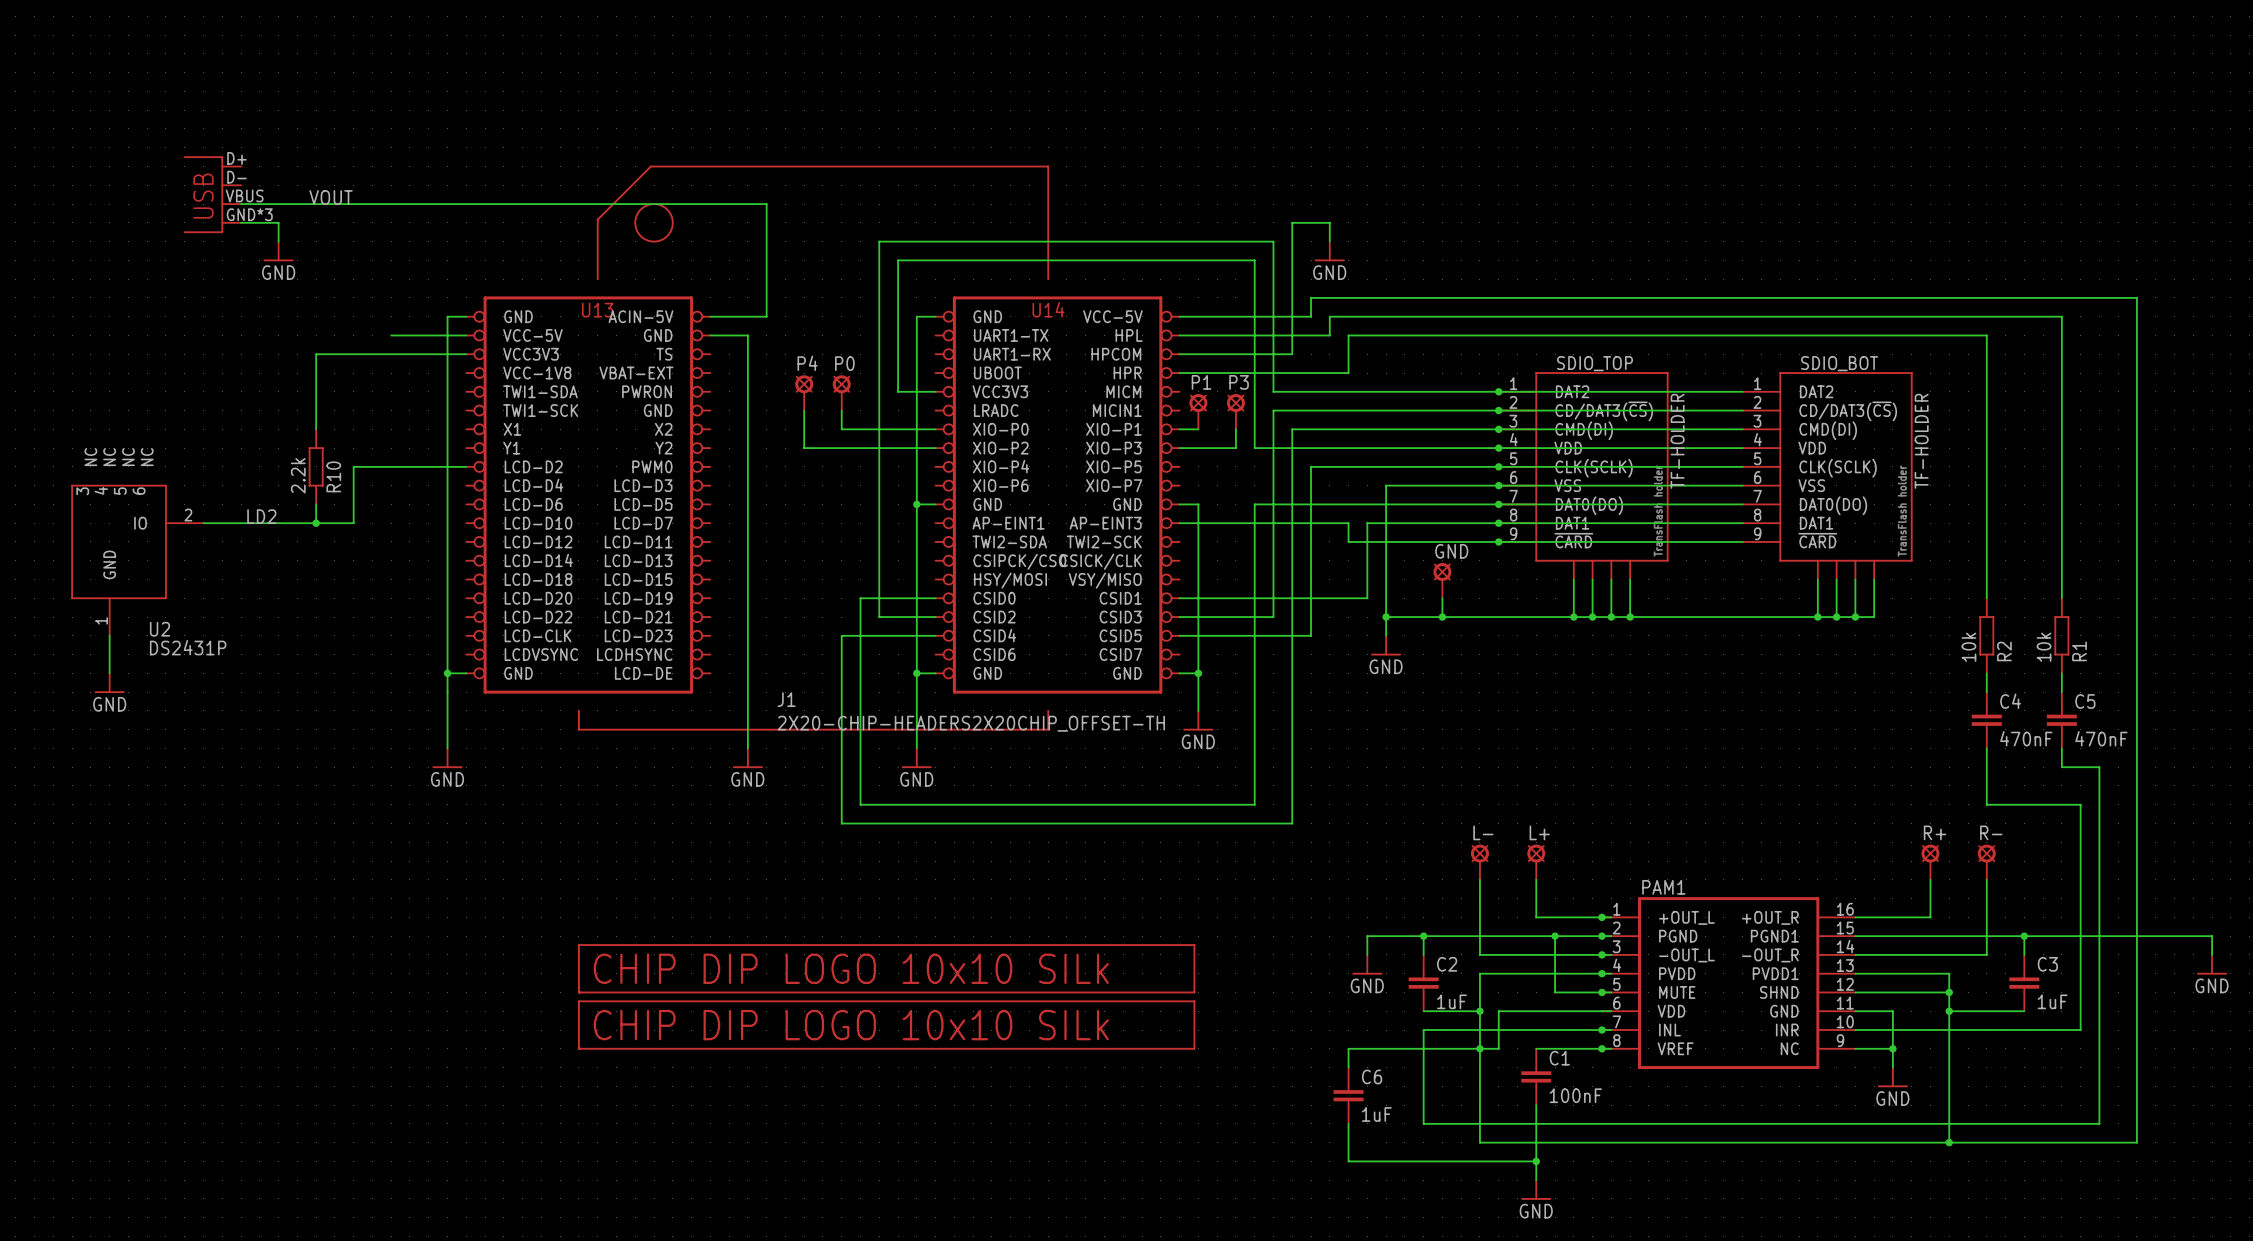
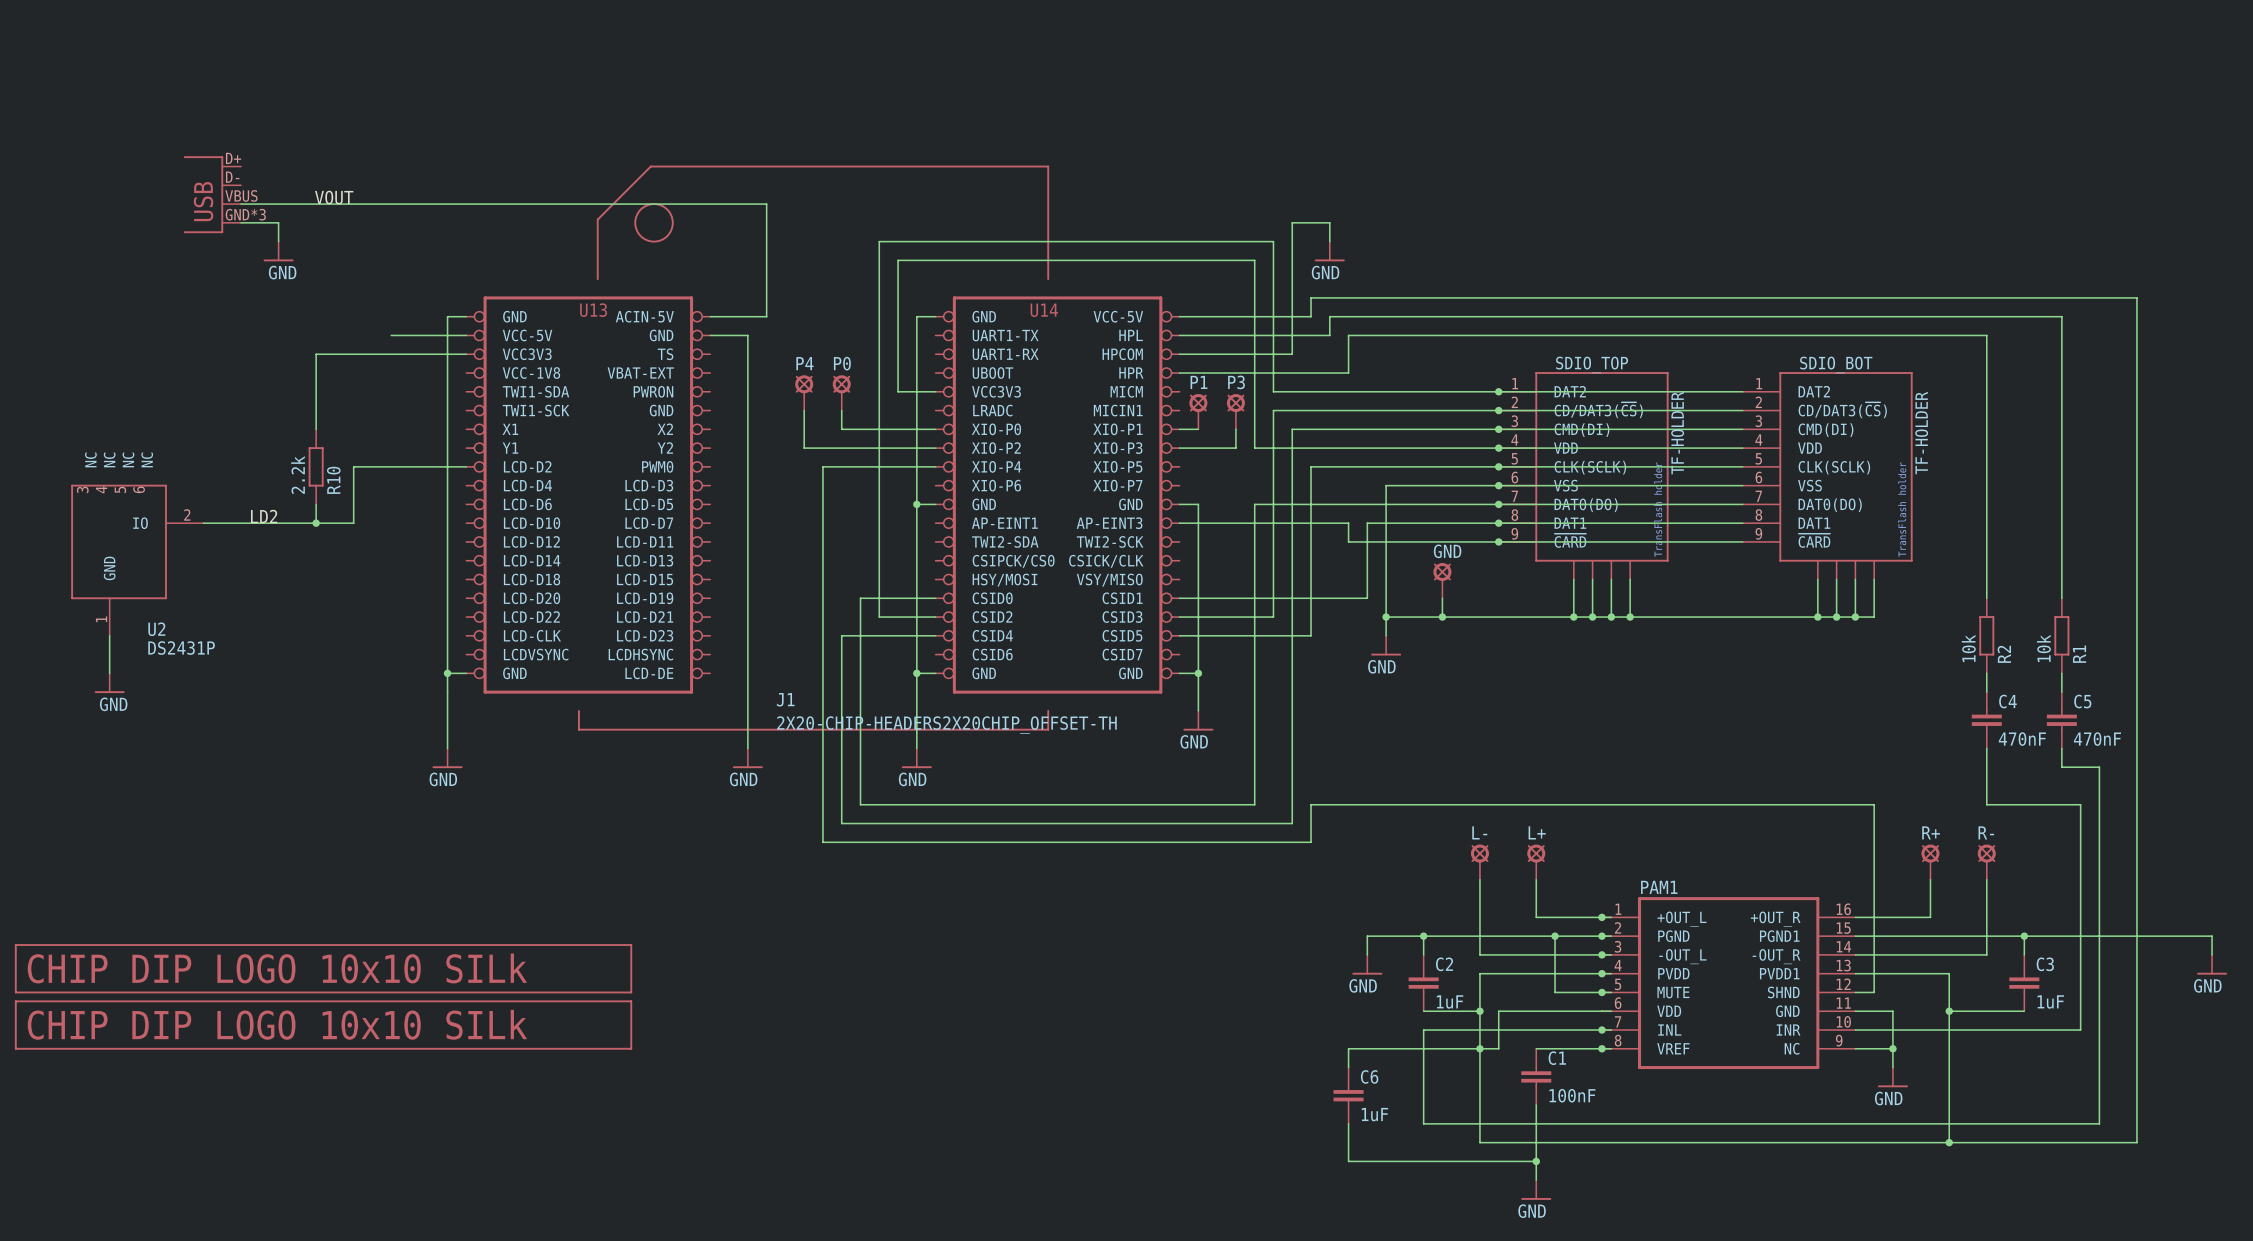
part: none -> (323, 968)
part: (886, 968) -> none
wire: (1874, 992) (1949, 992) -> (1874, 992) (1874, 804) (1311, 804) (1311, 842) (822, 842) (822, 466) (935, 466)
junction: (1949, 992) -> none
part: none -> (323, 1025)
part: (886, 1025) -> none

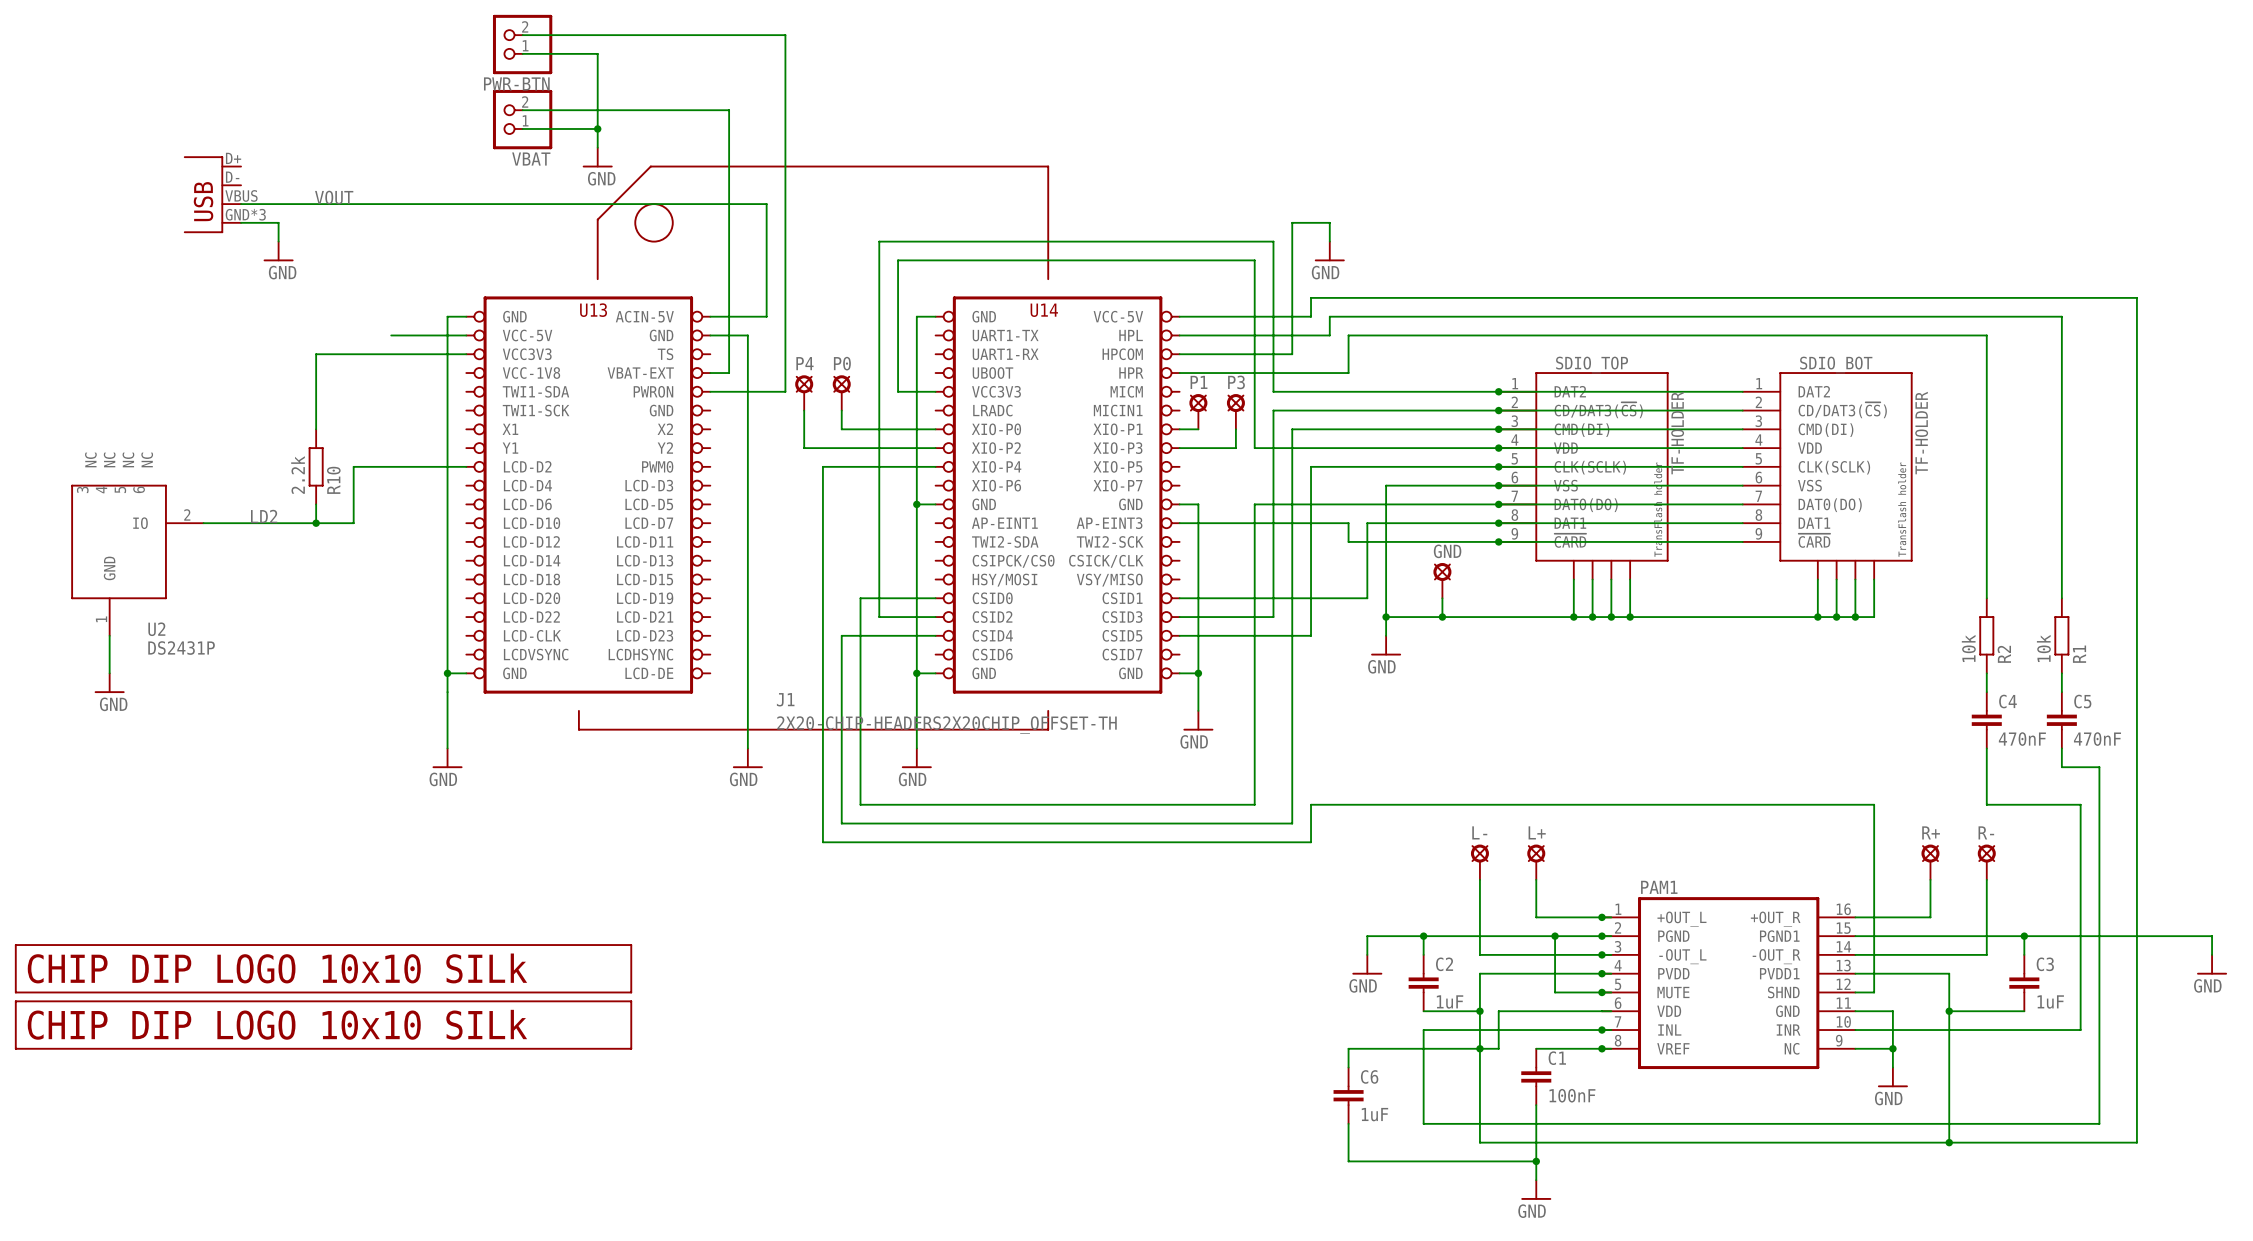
wire: none -> (522, 35) (785, 35) (785, 391) (710, 391)
PWR-BTN: none -> (522, 44)
wire: none -> (522, 53) (597, 53) (597, 147)
wire: none -> (522, 110) (729, 110) (729, 373) (710, 373)
VBAT: none -> (522, 119)
wire: none -> (522, 128) (597, 128)
junction: none -> (597, 128)
power symbol: none -> GND (597, 157)

